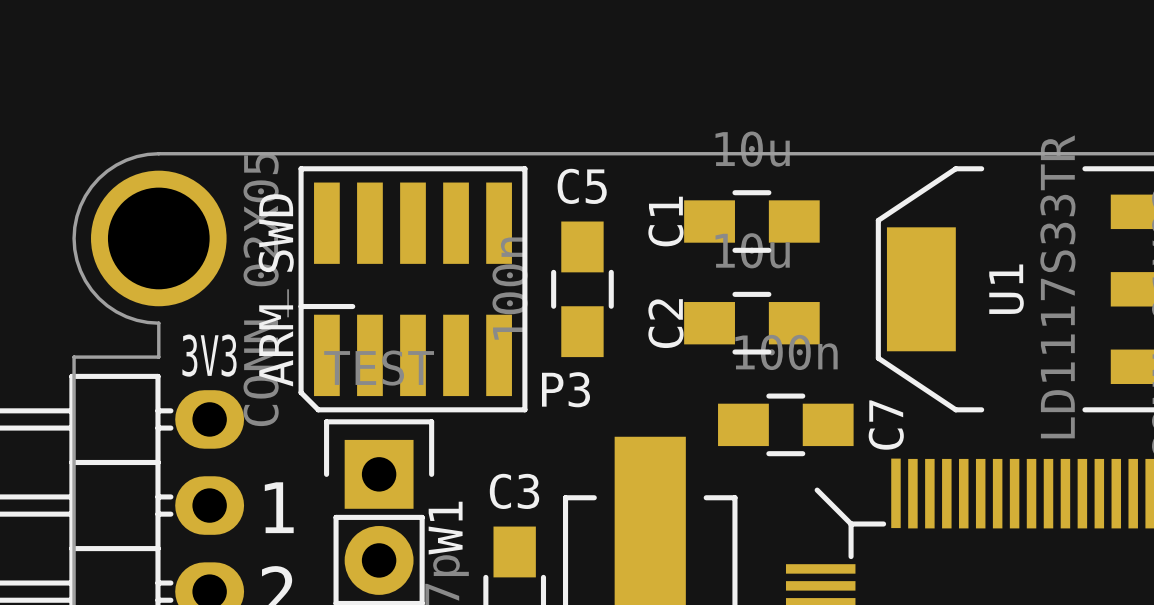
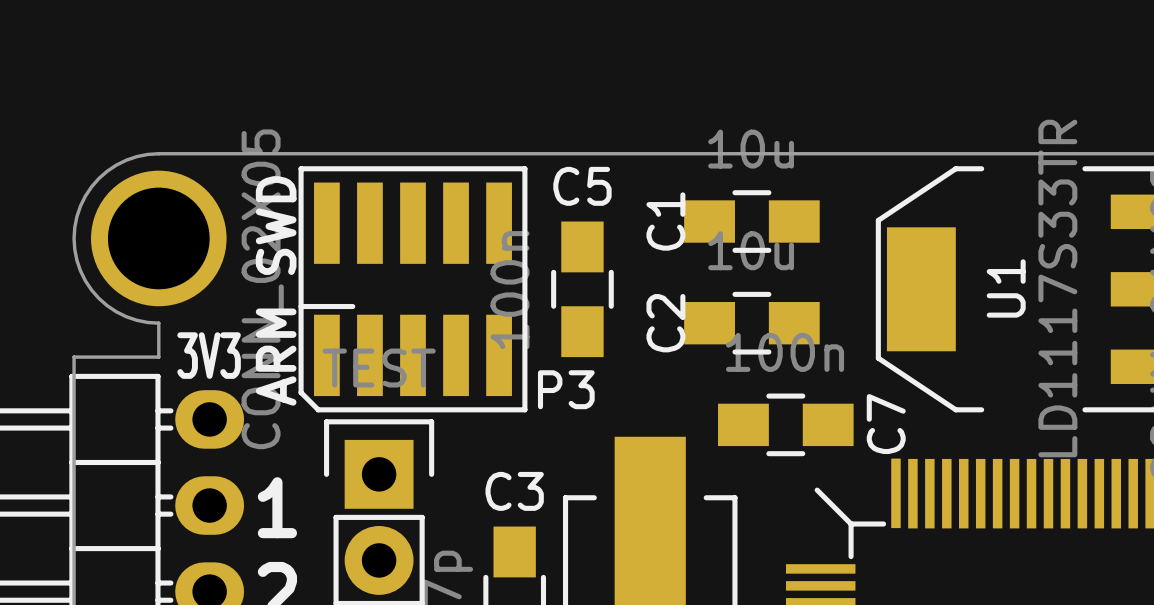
W1 name: W1 (445, 528) -> none

